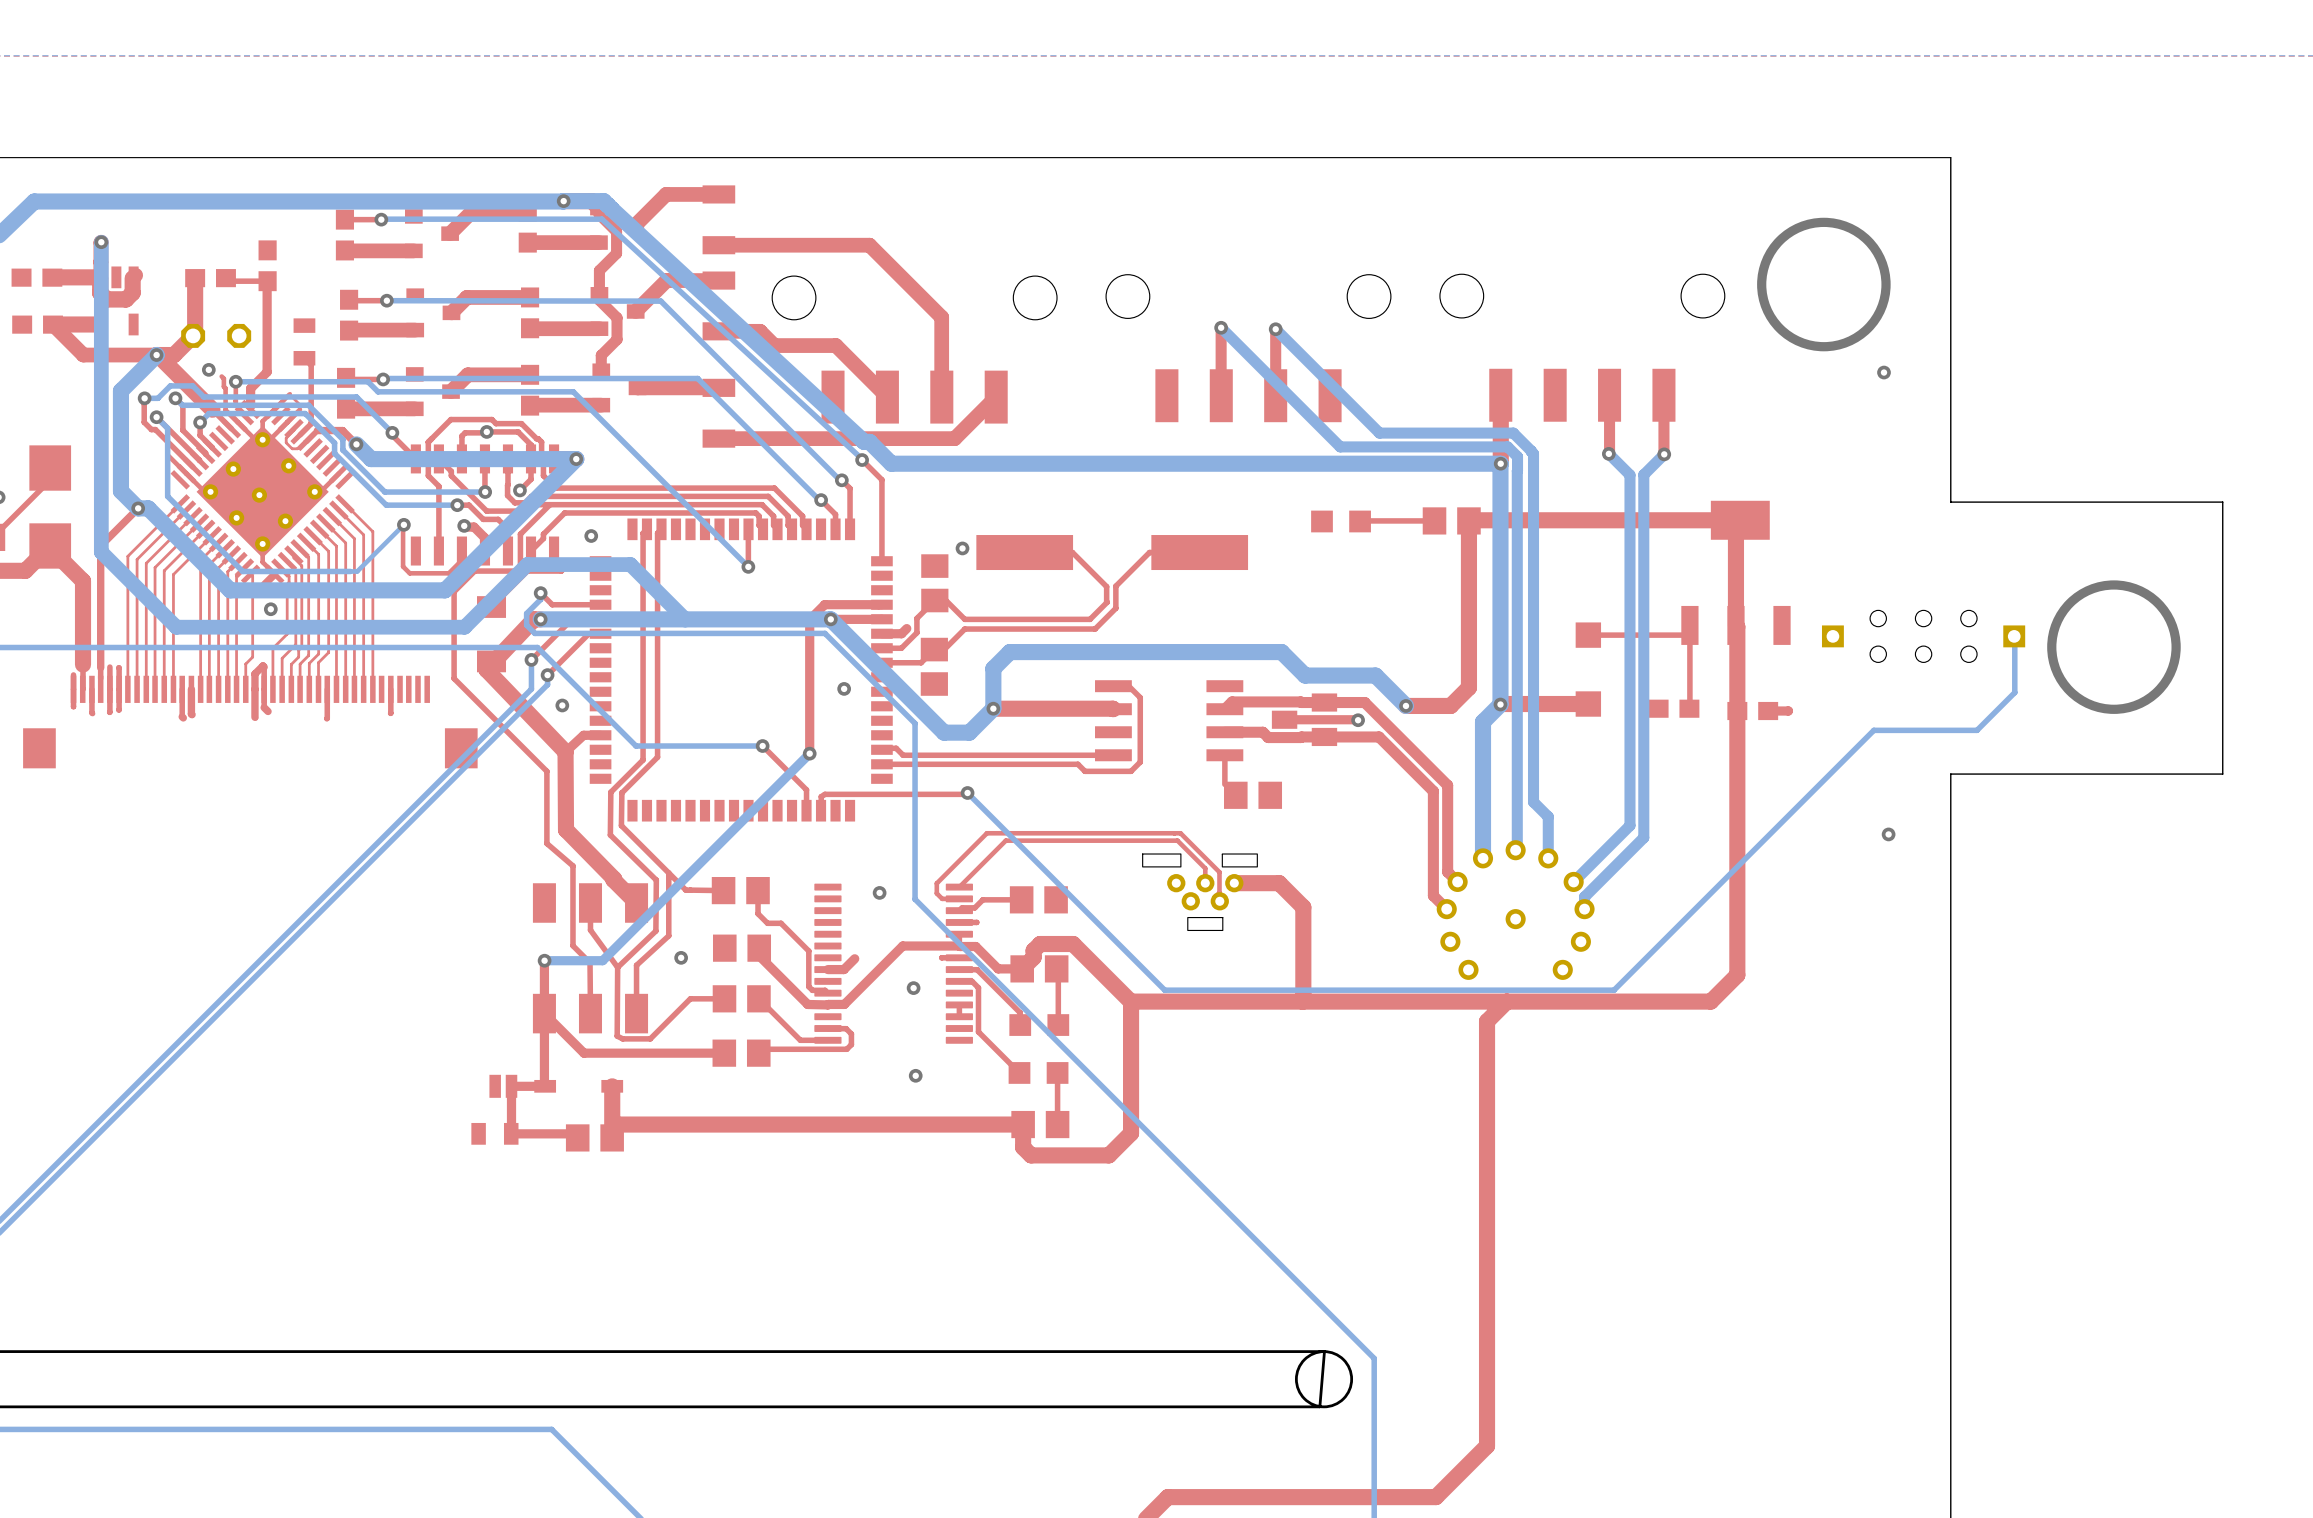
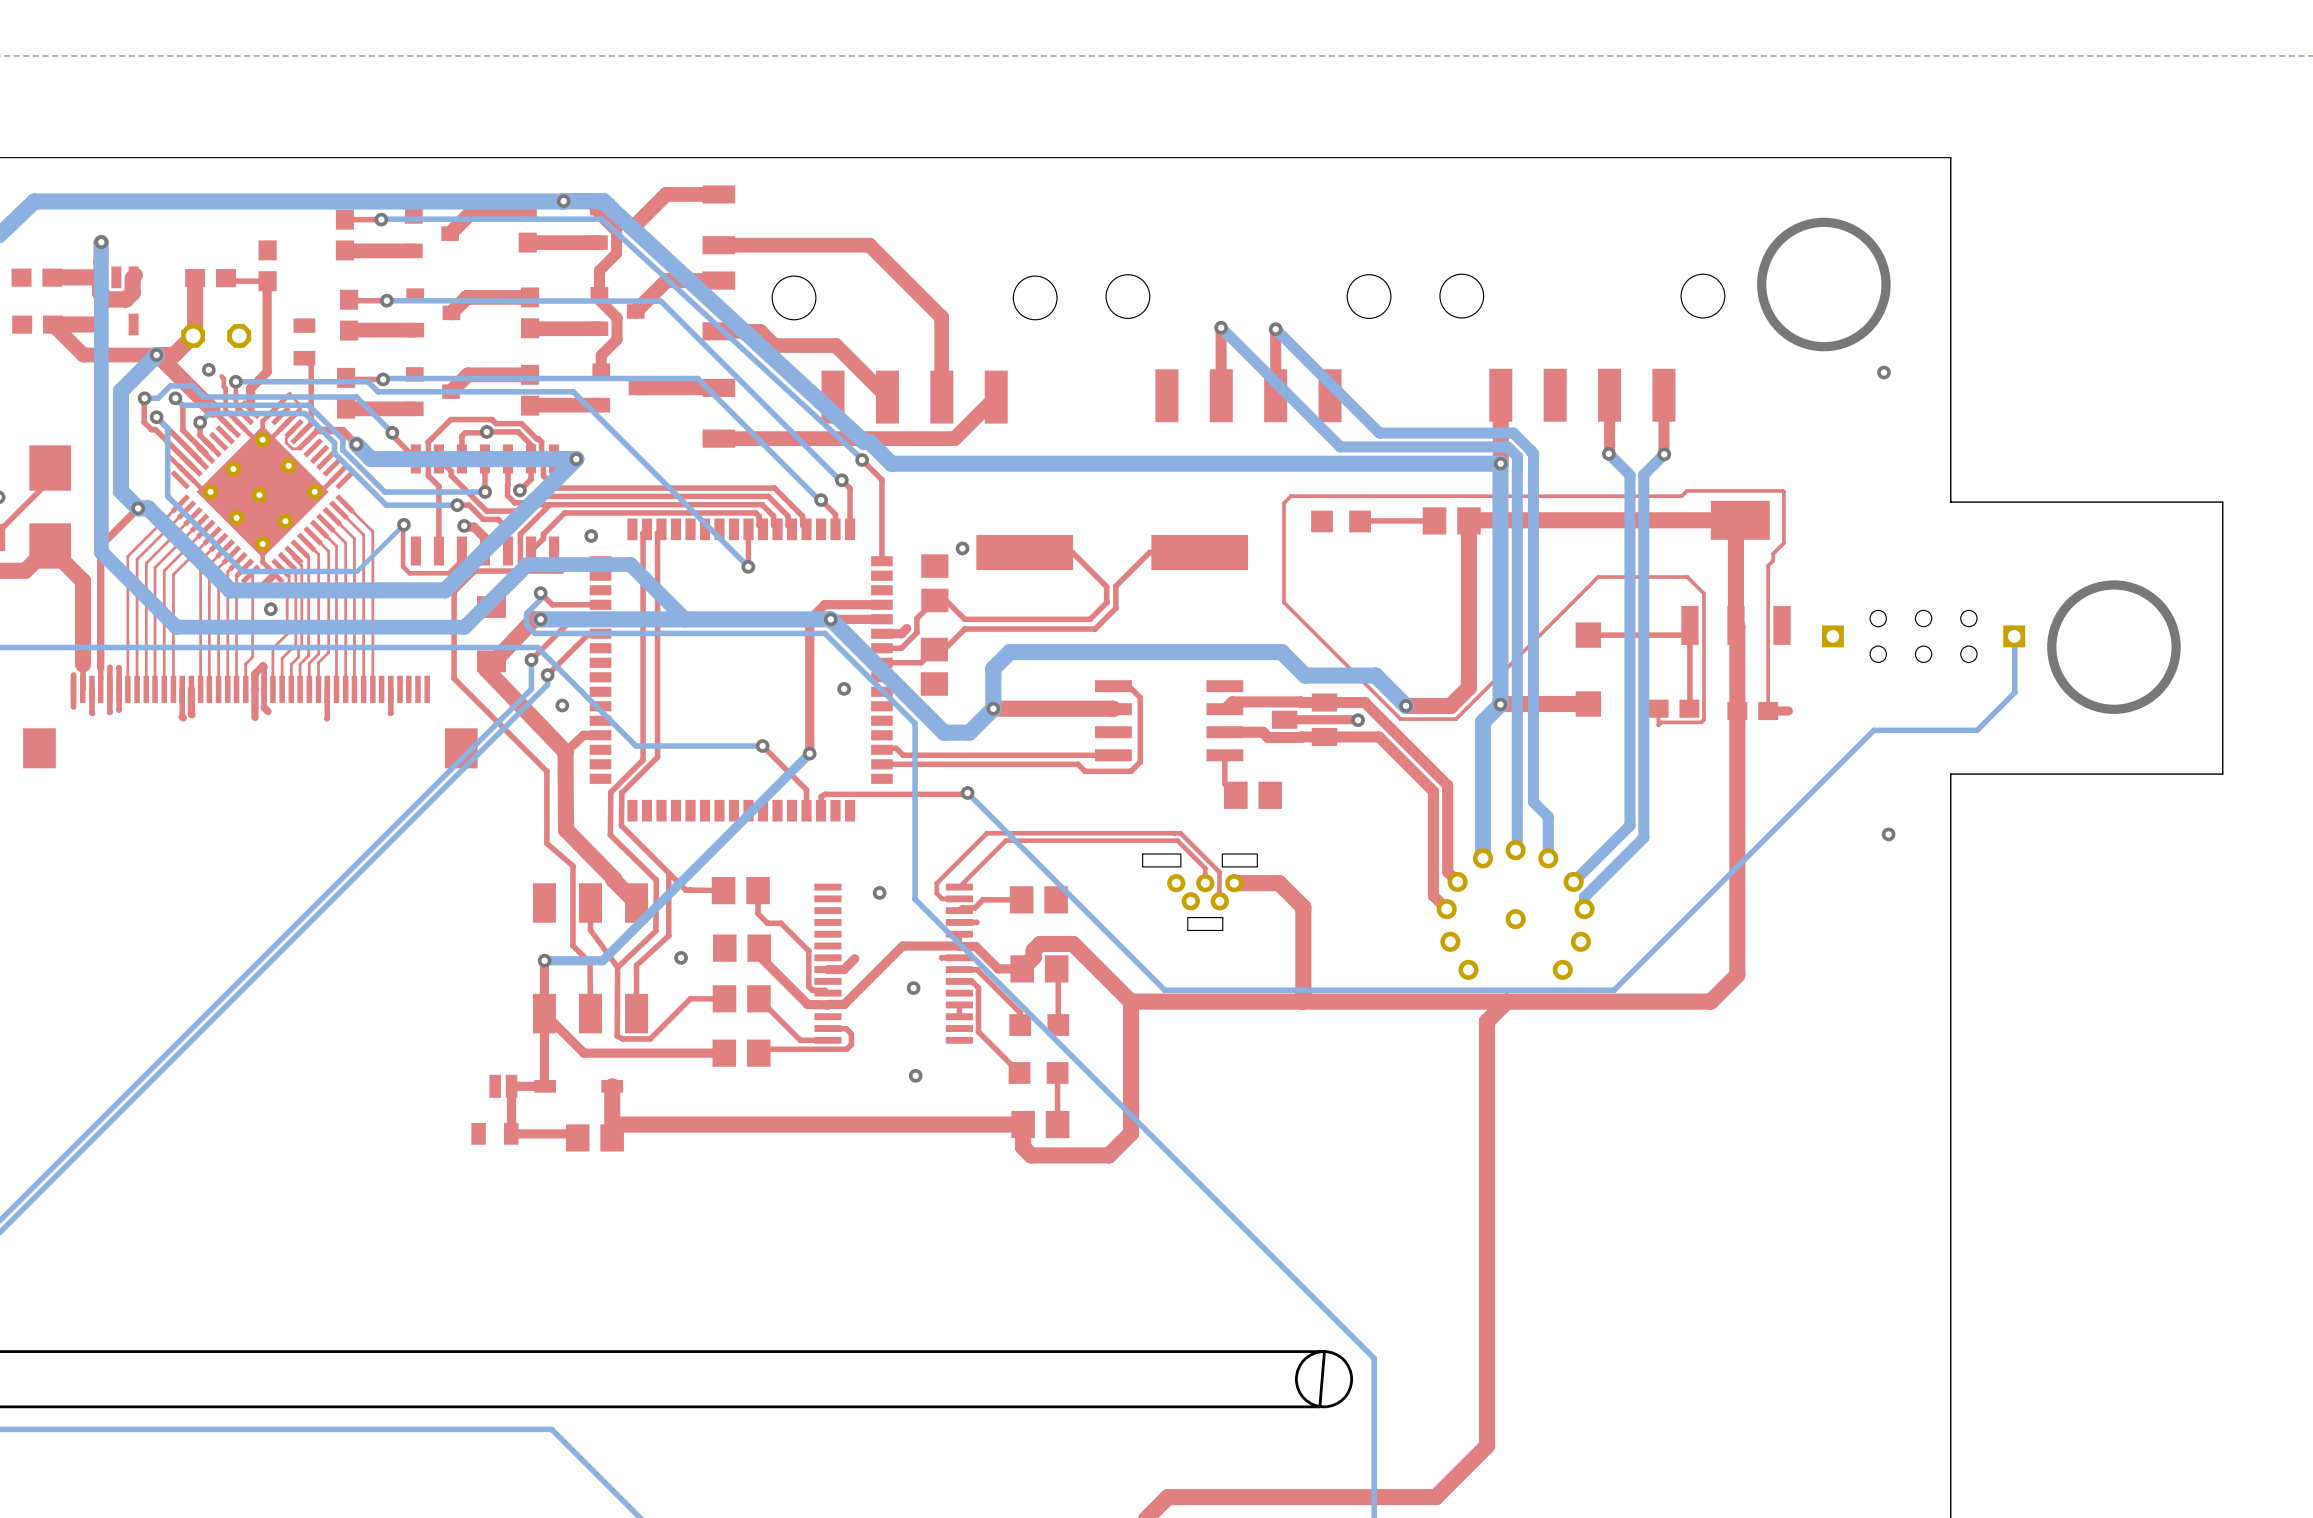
top track: none -> (1658, 708) (1658, 725) (1661, 722) (1701, 722) (1703, 719) (1703, 593) (1687, 577) (1598, 577) (1456, 719) (1400, 719) (1283, 602) (1283, 503) (1291, 496) (1681, 496) (1686, 490) (1782, 490) (1783, 543) (1773, 553) (1773, 560) (1768, 565) (1768, 711)

